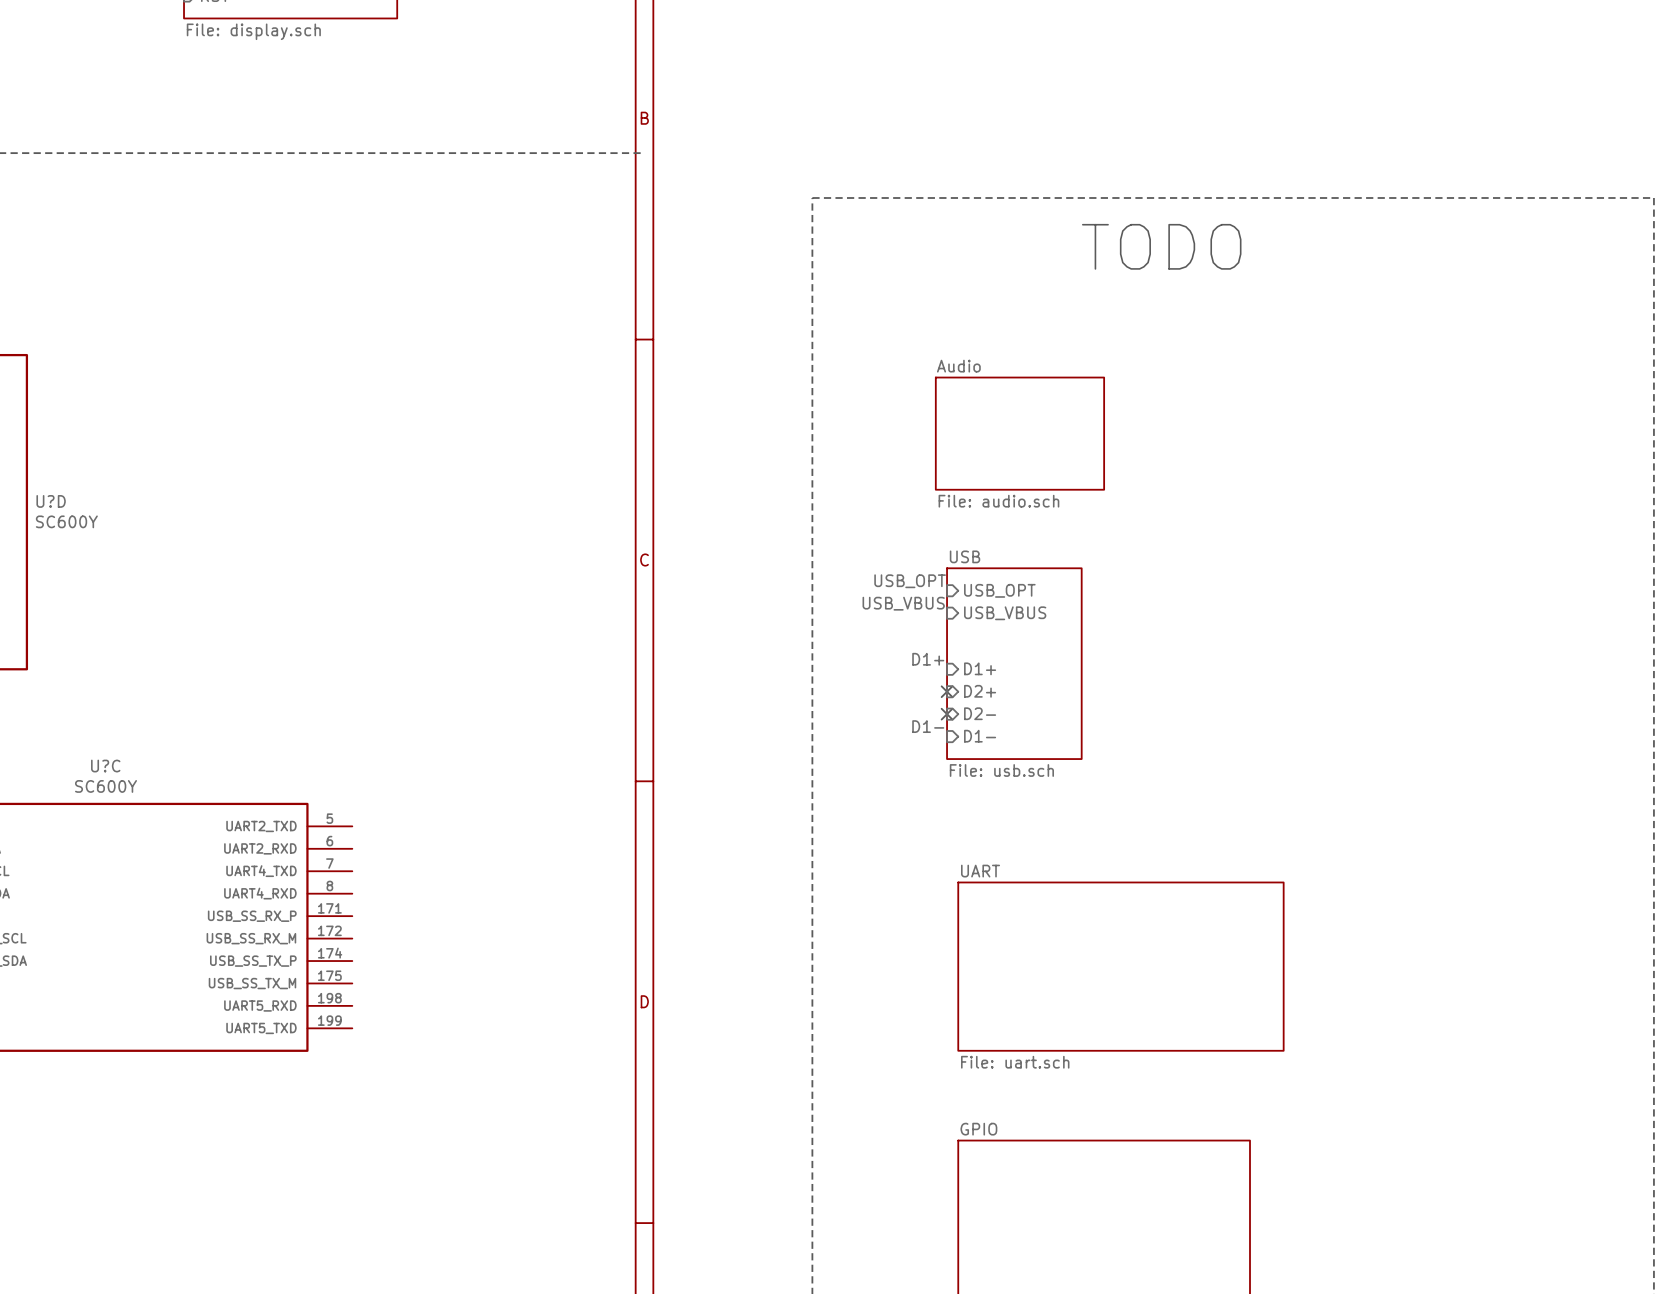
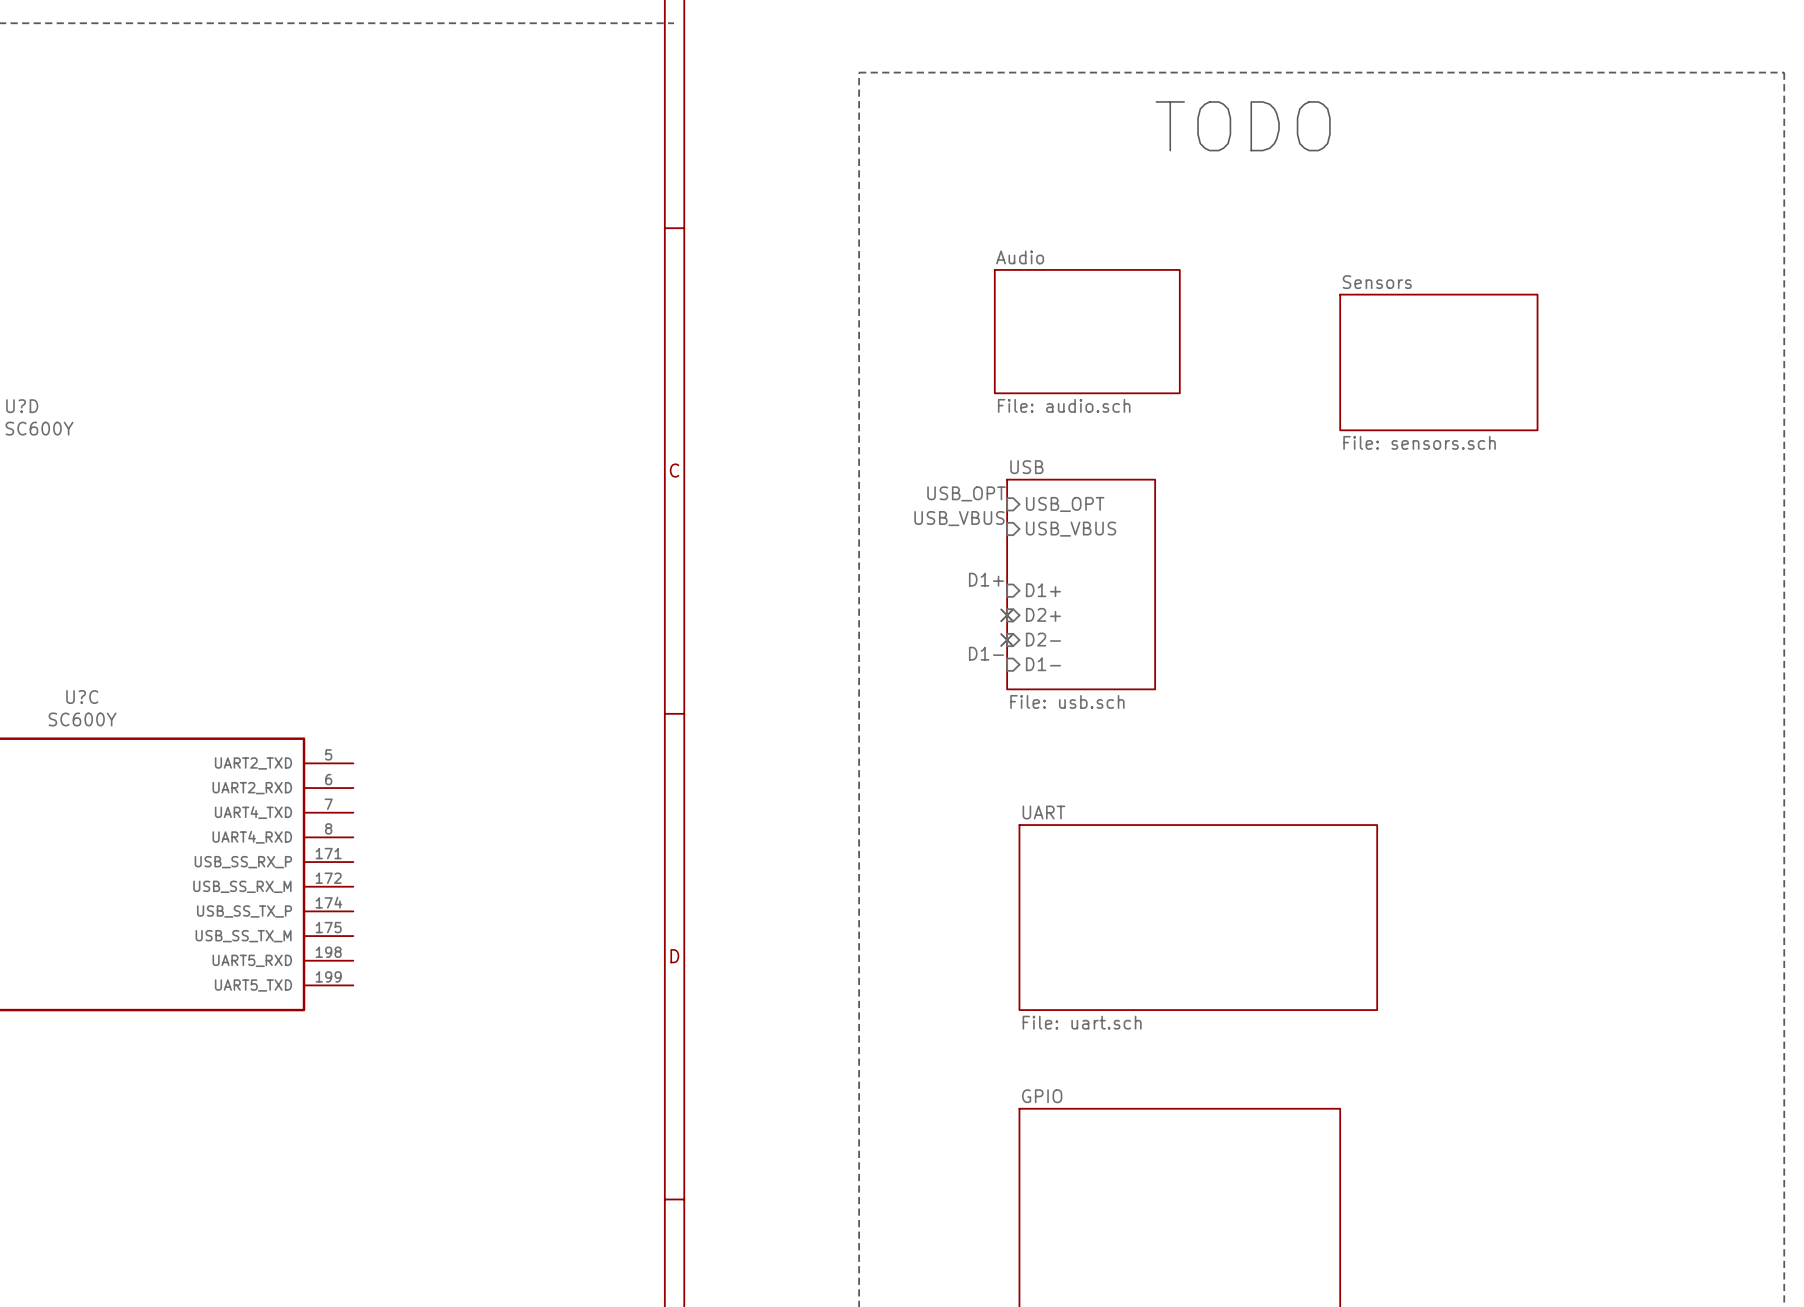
sheet Sensors: none -> File: sensors.sch (1438, 362)

